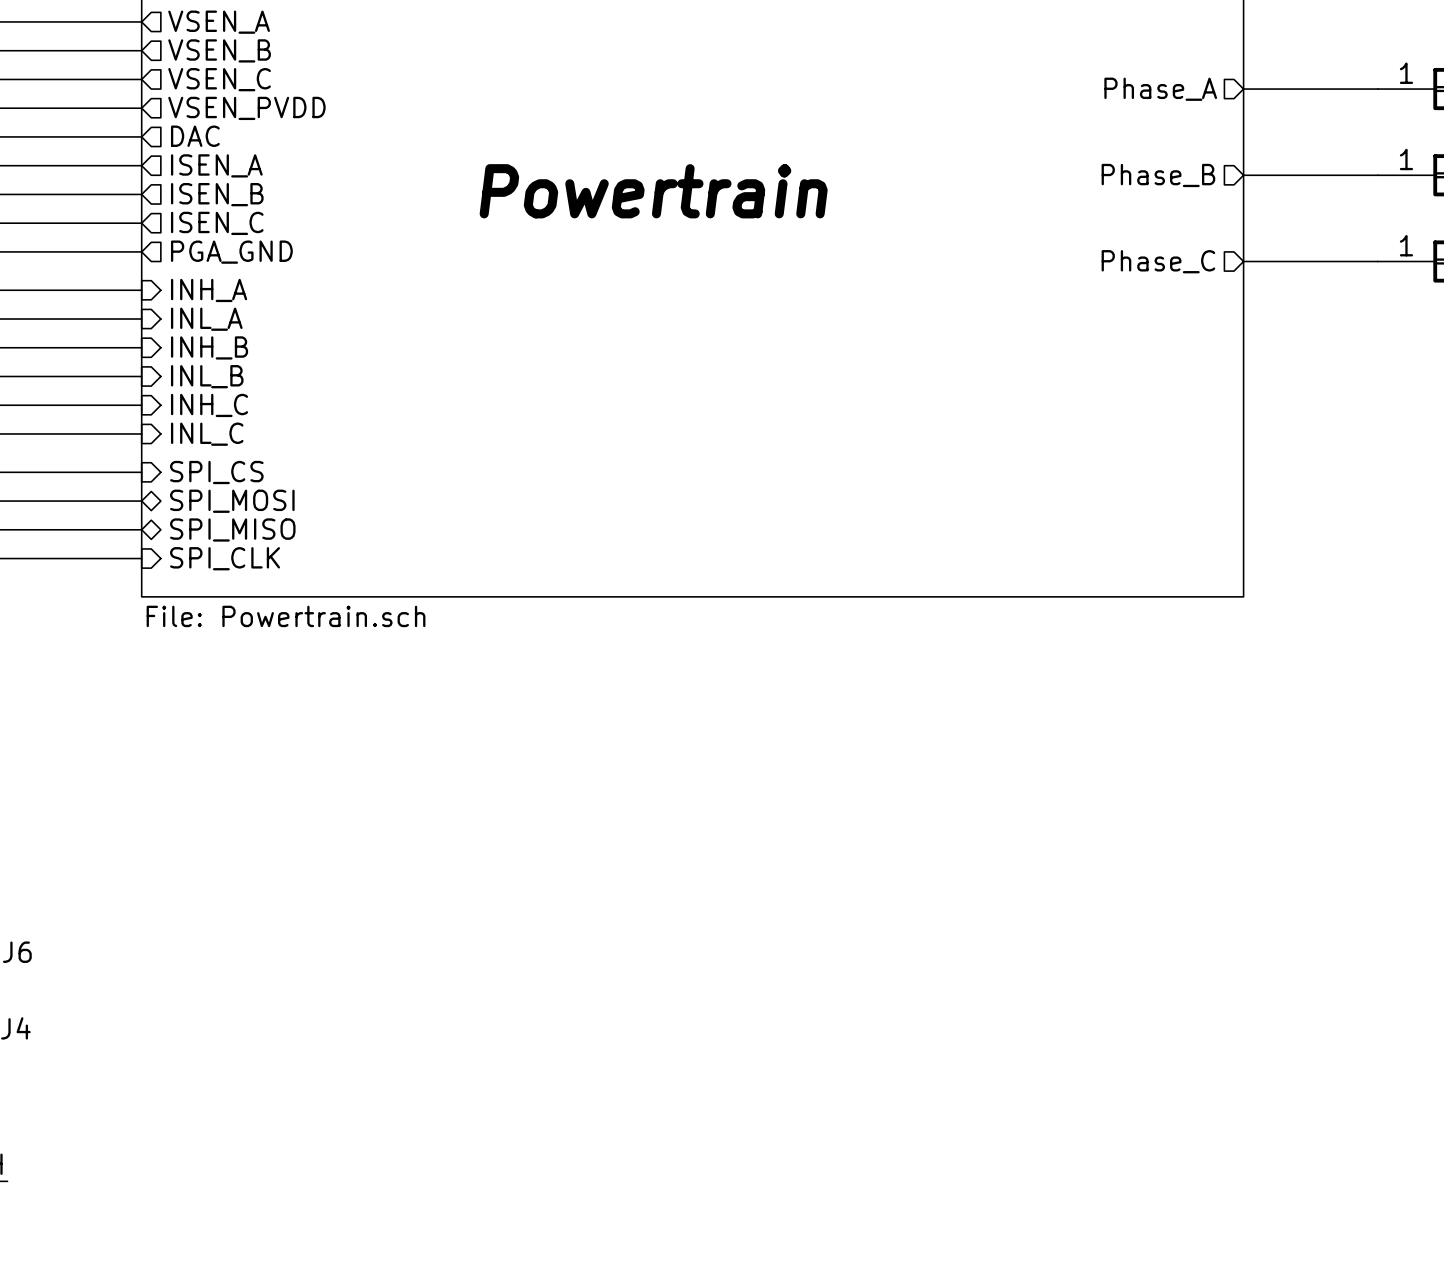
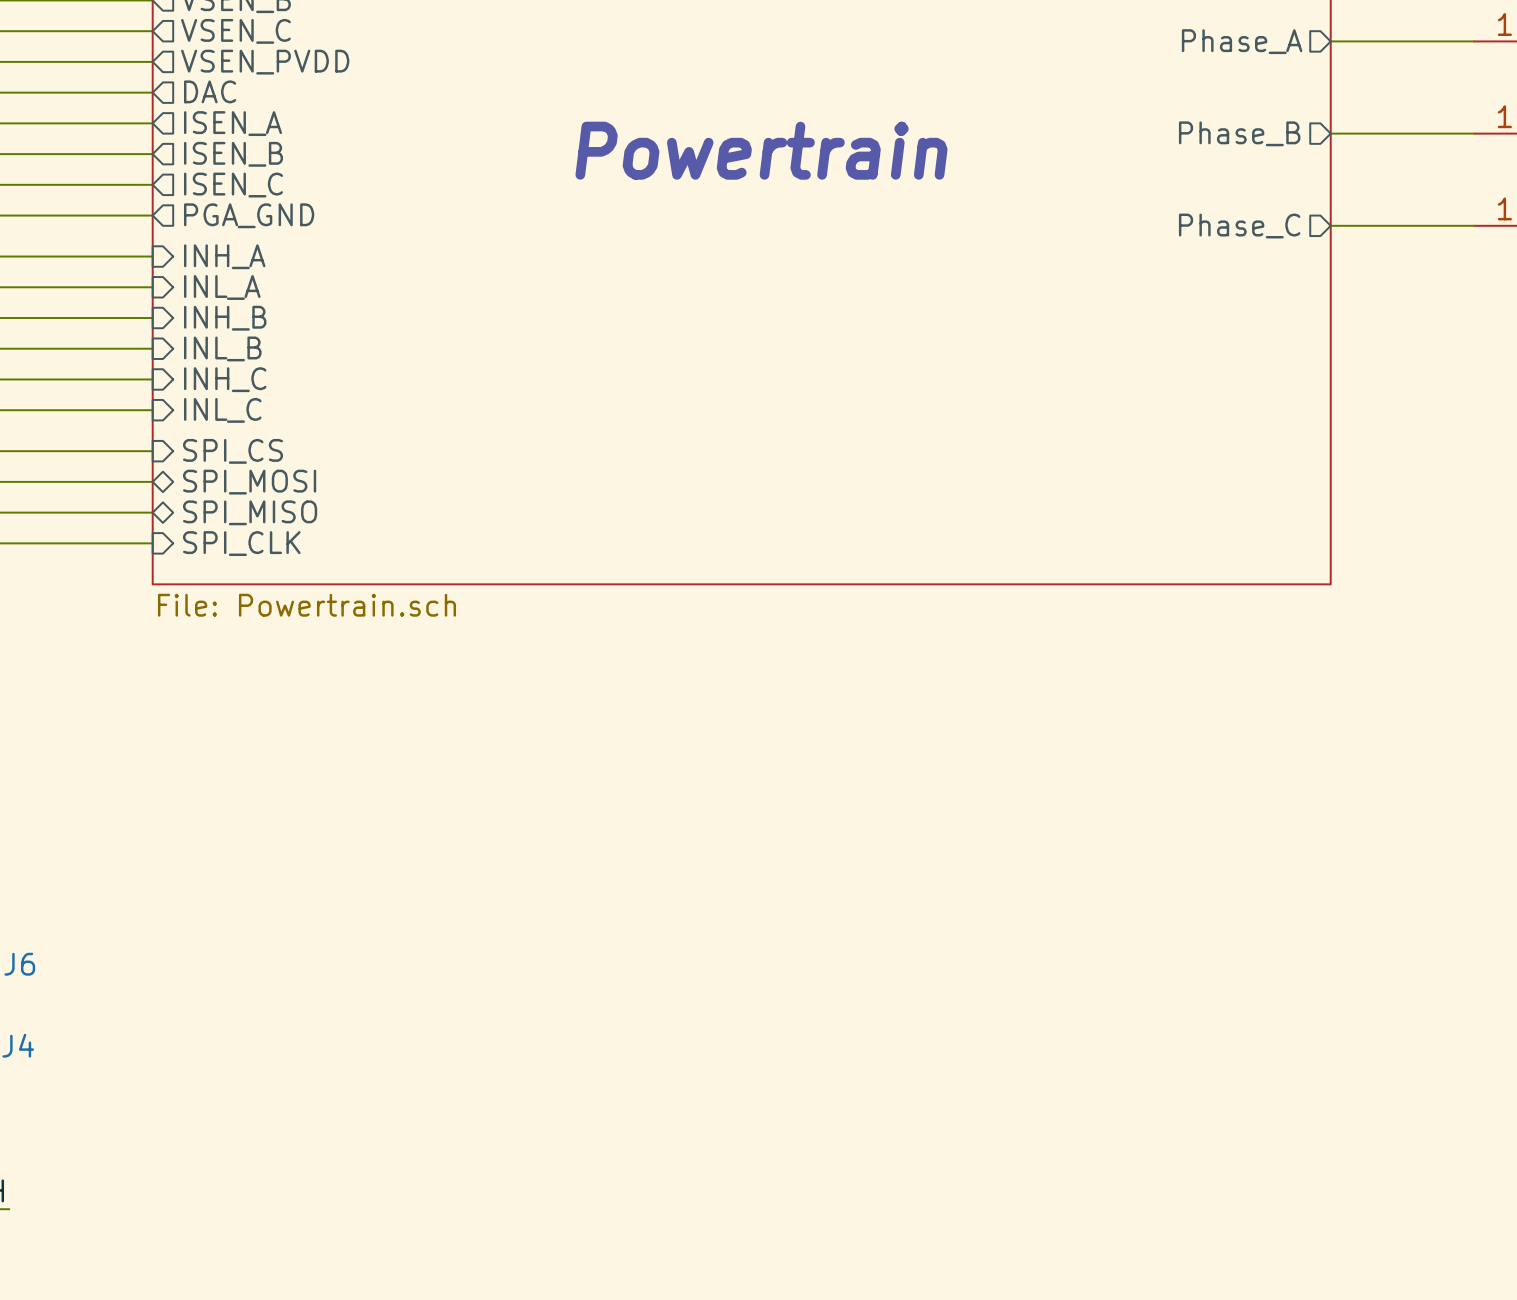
text position: Powertrain (653, 191) -> Powertrain (761, 150)

